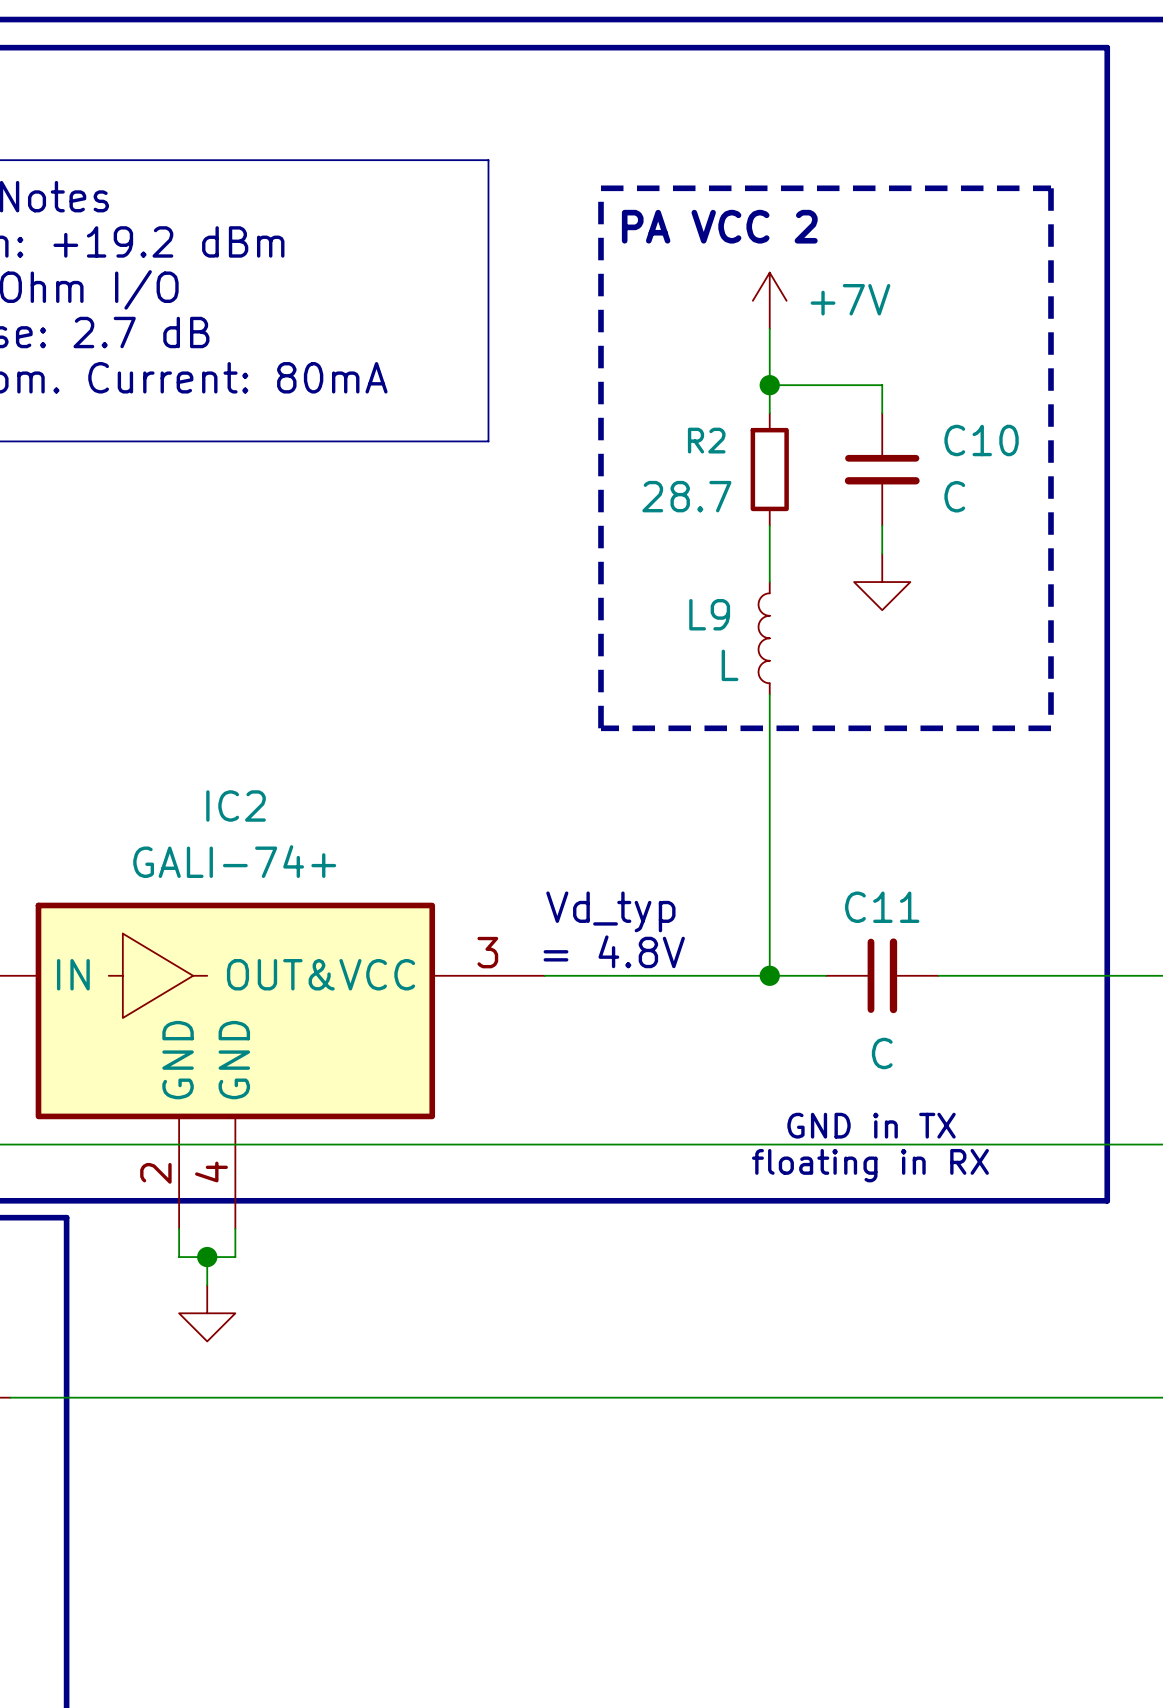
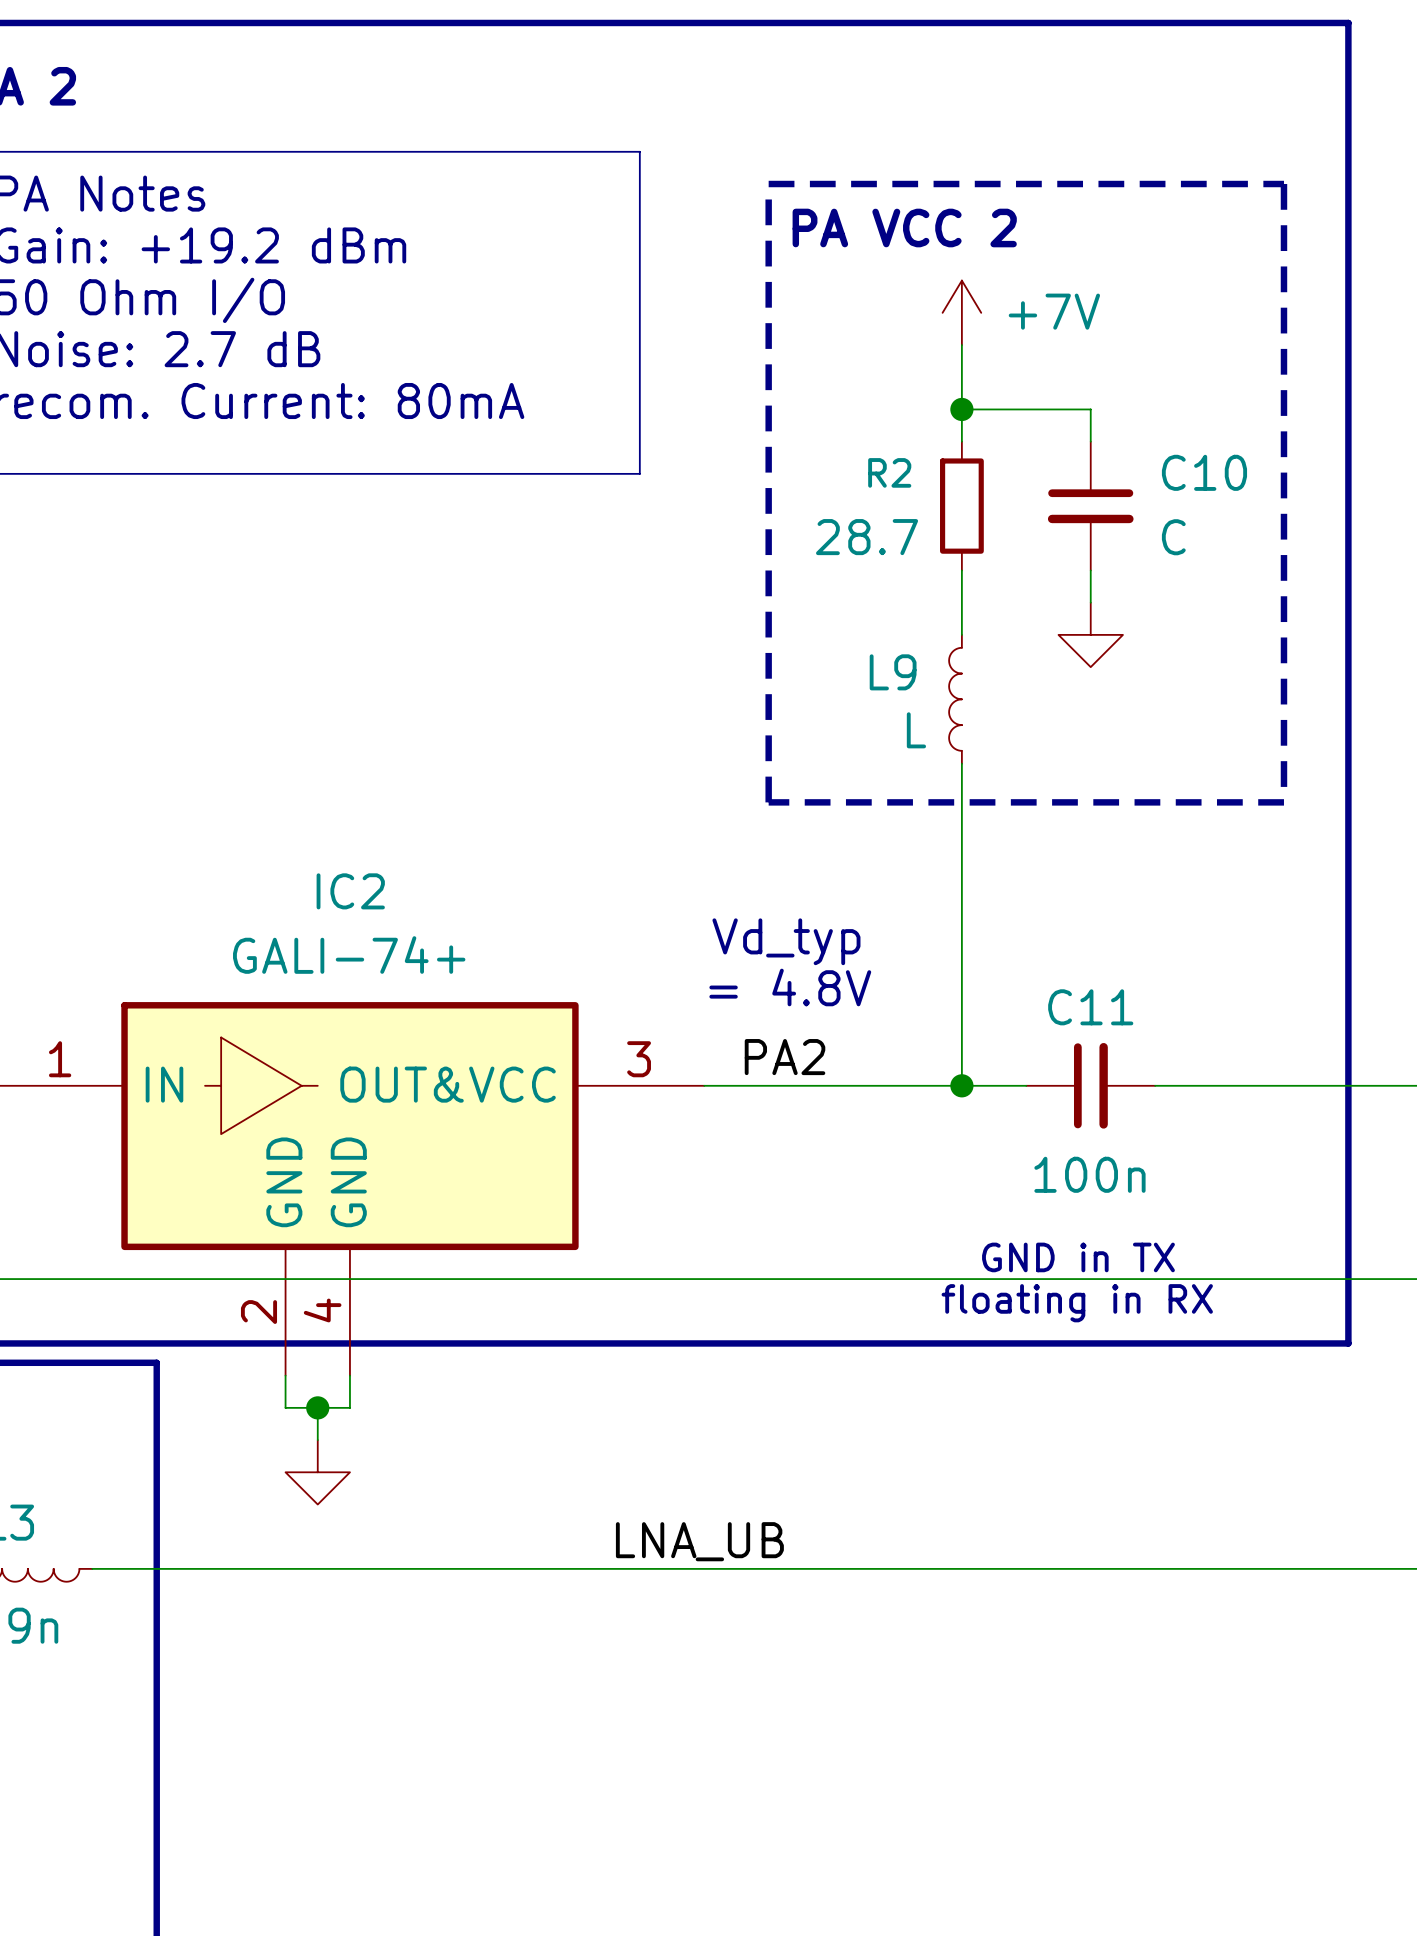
text: none -> Vd_typ (786, 941)
text: Vd_typ (610, 911) -> = 4.8V (790, 987)
label: none -> PA2 (785, 1057)
text: = 4.8V (614, 951) -> none
C11 value: C (882, 1053) -> 100n (1089, 1174)
label: none -> LNA_UB (699, 1541)

